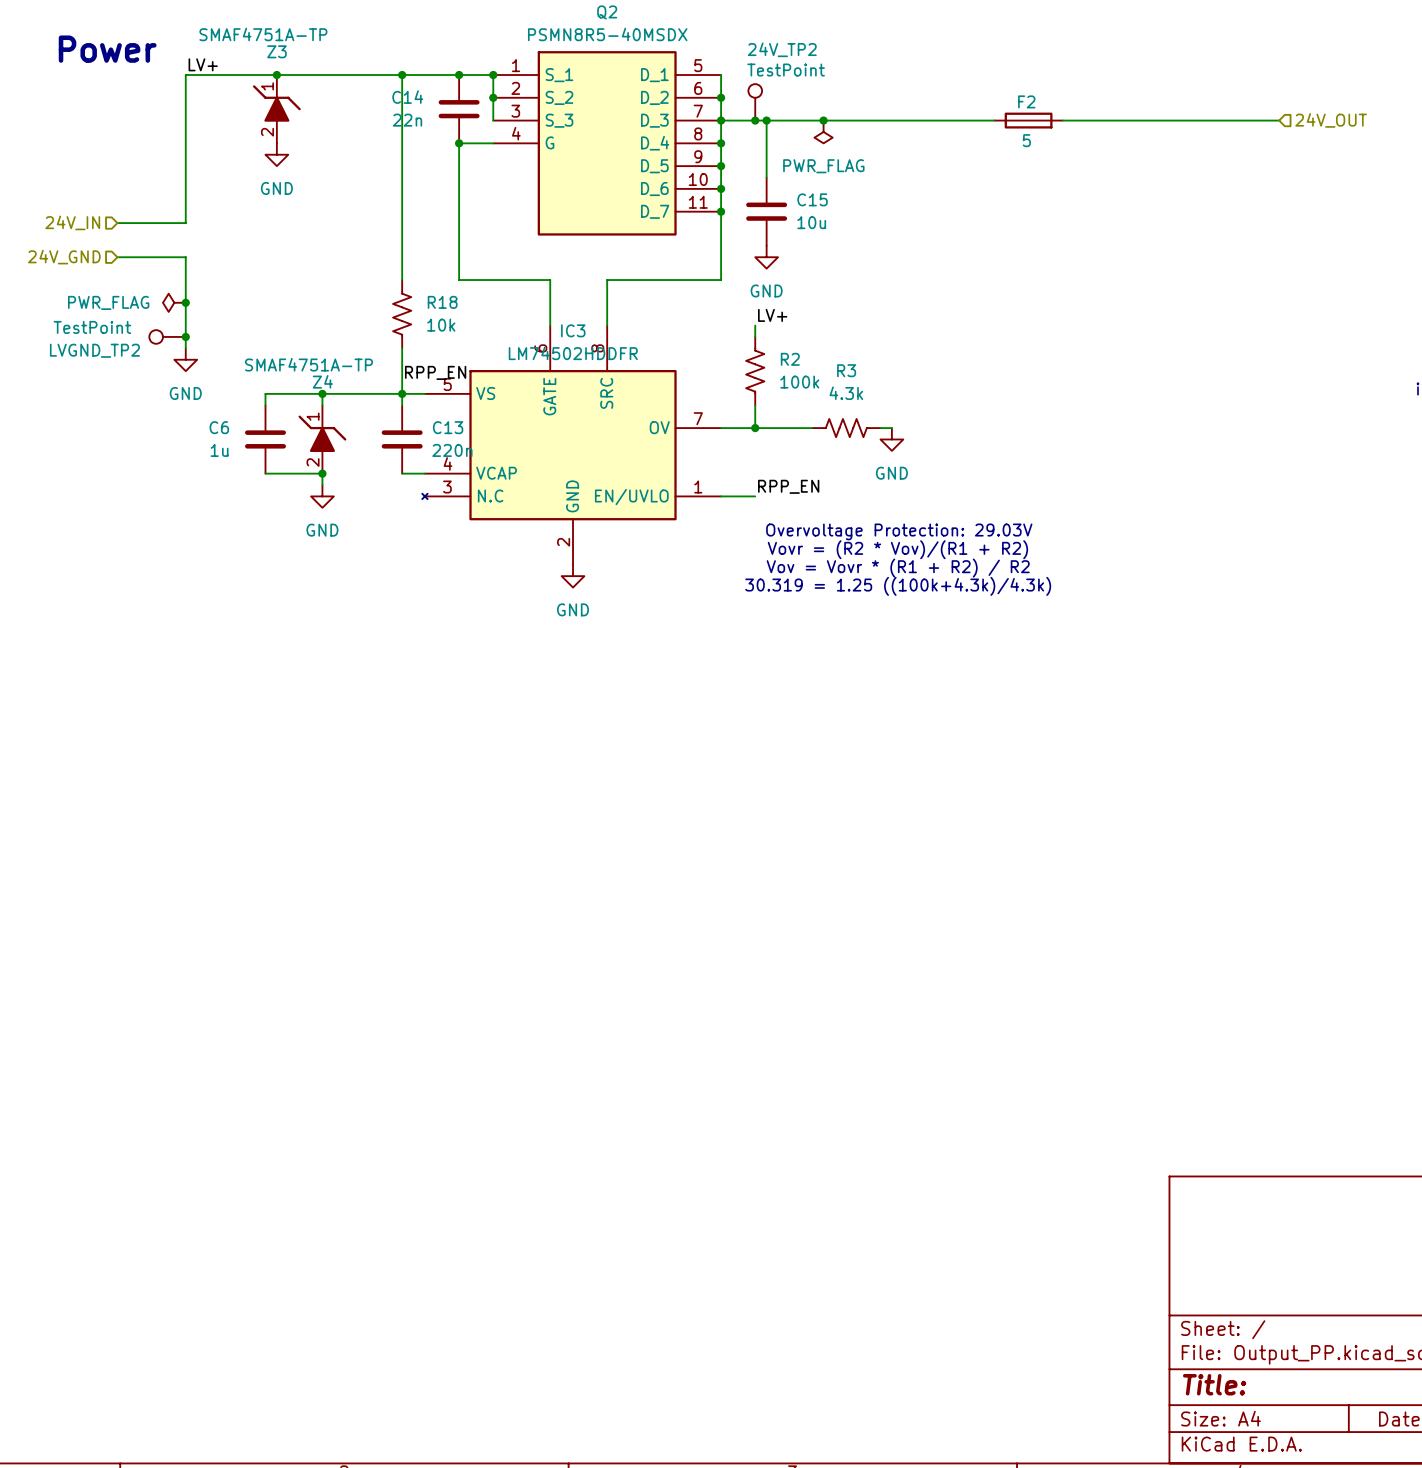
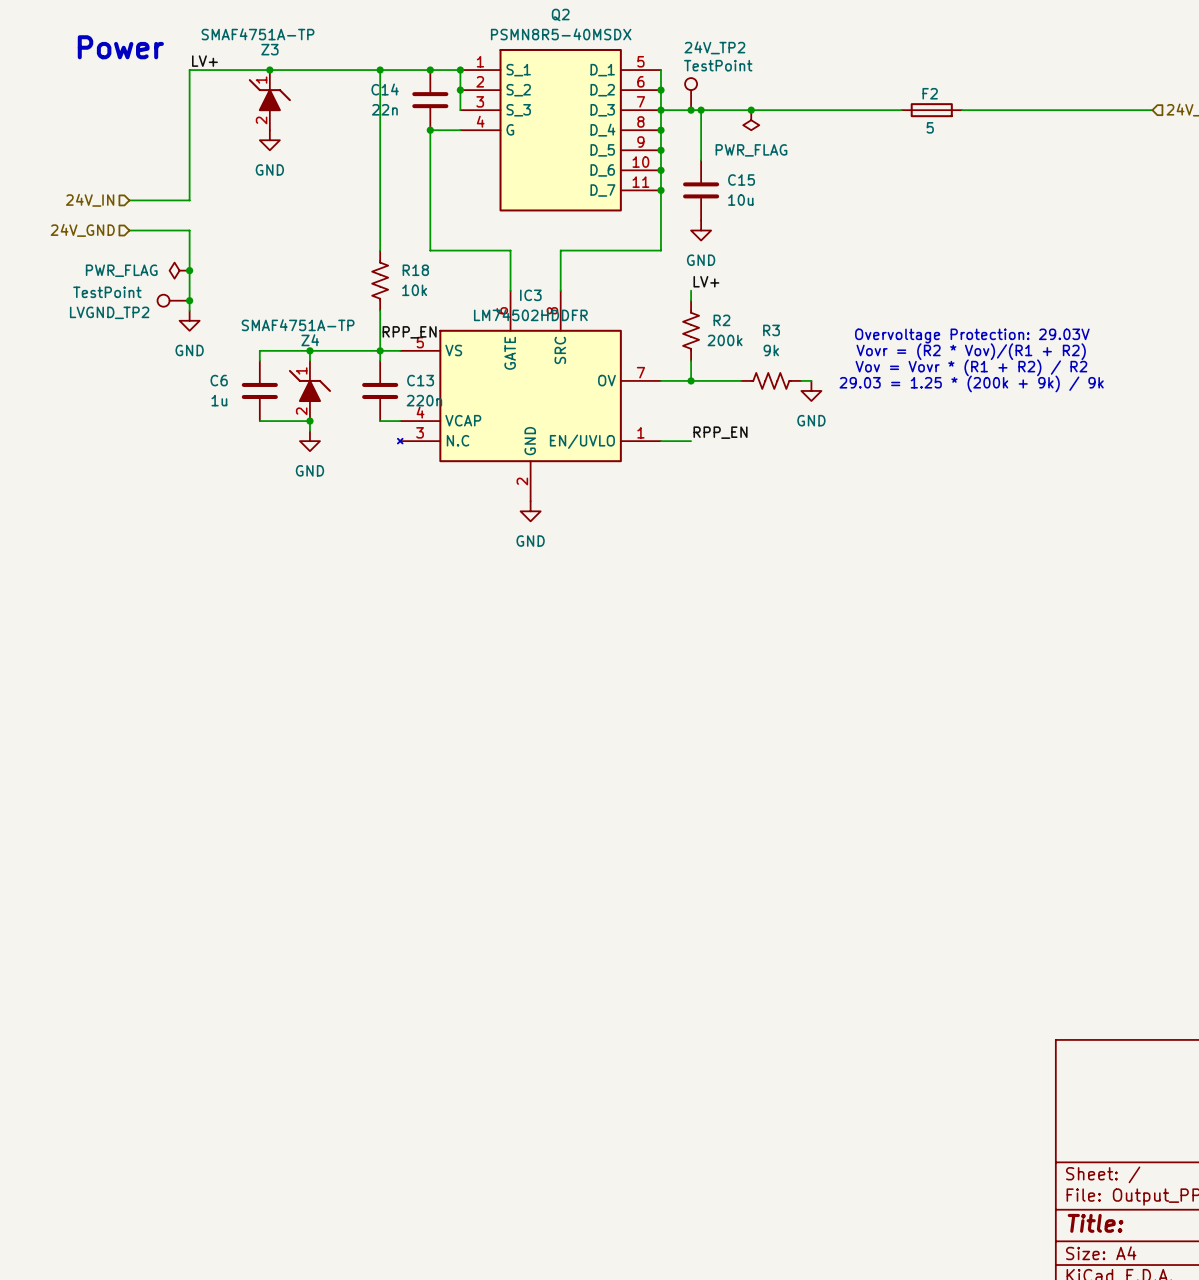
text: none -> Overvoltage Protection: 29.03V (972, 335)
R2 value: 100k (799, 382) -> 200k (725, 340)
R3 value: 4.3k (846, 393) -> 9k (771, 350)
text: none -> Vovr = (R2 * Vov)/(R1 + R2) (971, 351)
text: none -> Vov = Vovr * (R1 + R2) / R2 (971, 367)
text: none -> 29.03 = 1.25 * (200k + 9k) / 9k (971, 383)
text: Overvoltage Protection: 29.03V (899, 531) -> none
text: Vovr = (R2 * Vov)/(R1 + R2) (897, 549) -> none
text: Vov = Vovr * (R1 + R2) / R2 (898, 568) -> none
text: 30.319 = 1.25 ((100k+4.3k)/4.3k) (898, 586) -> none

